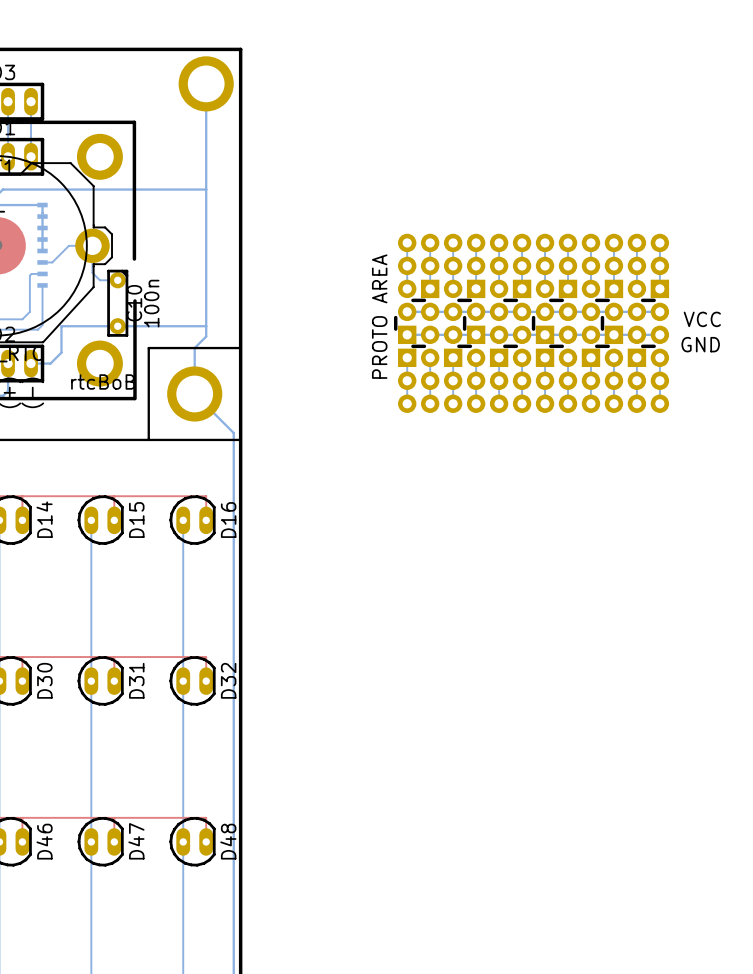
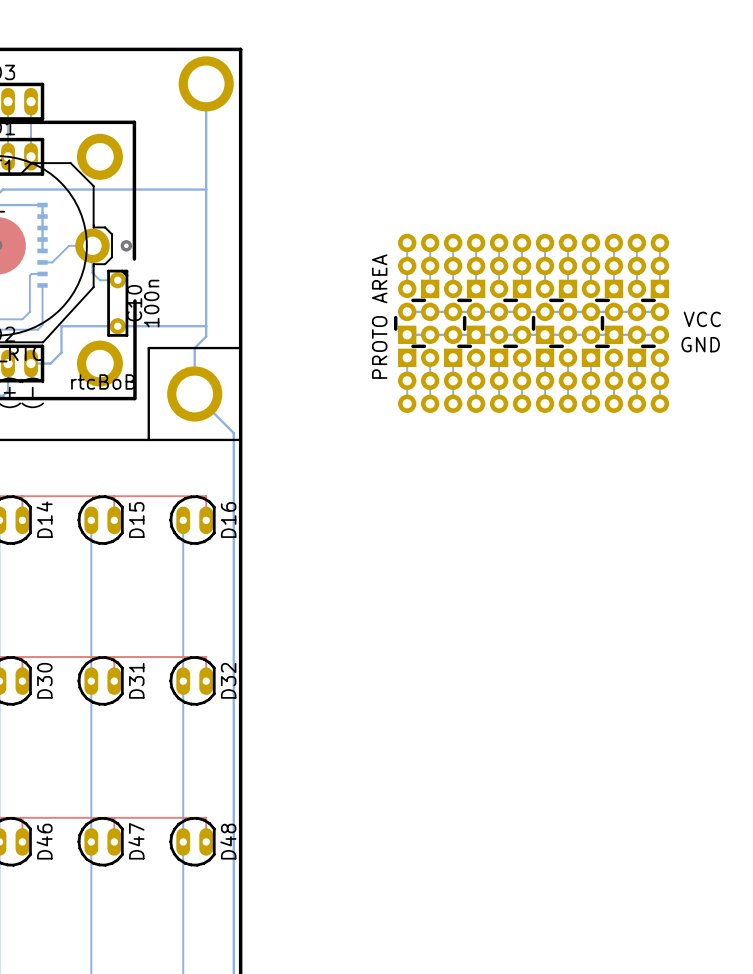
via: none -> (126, 245)

